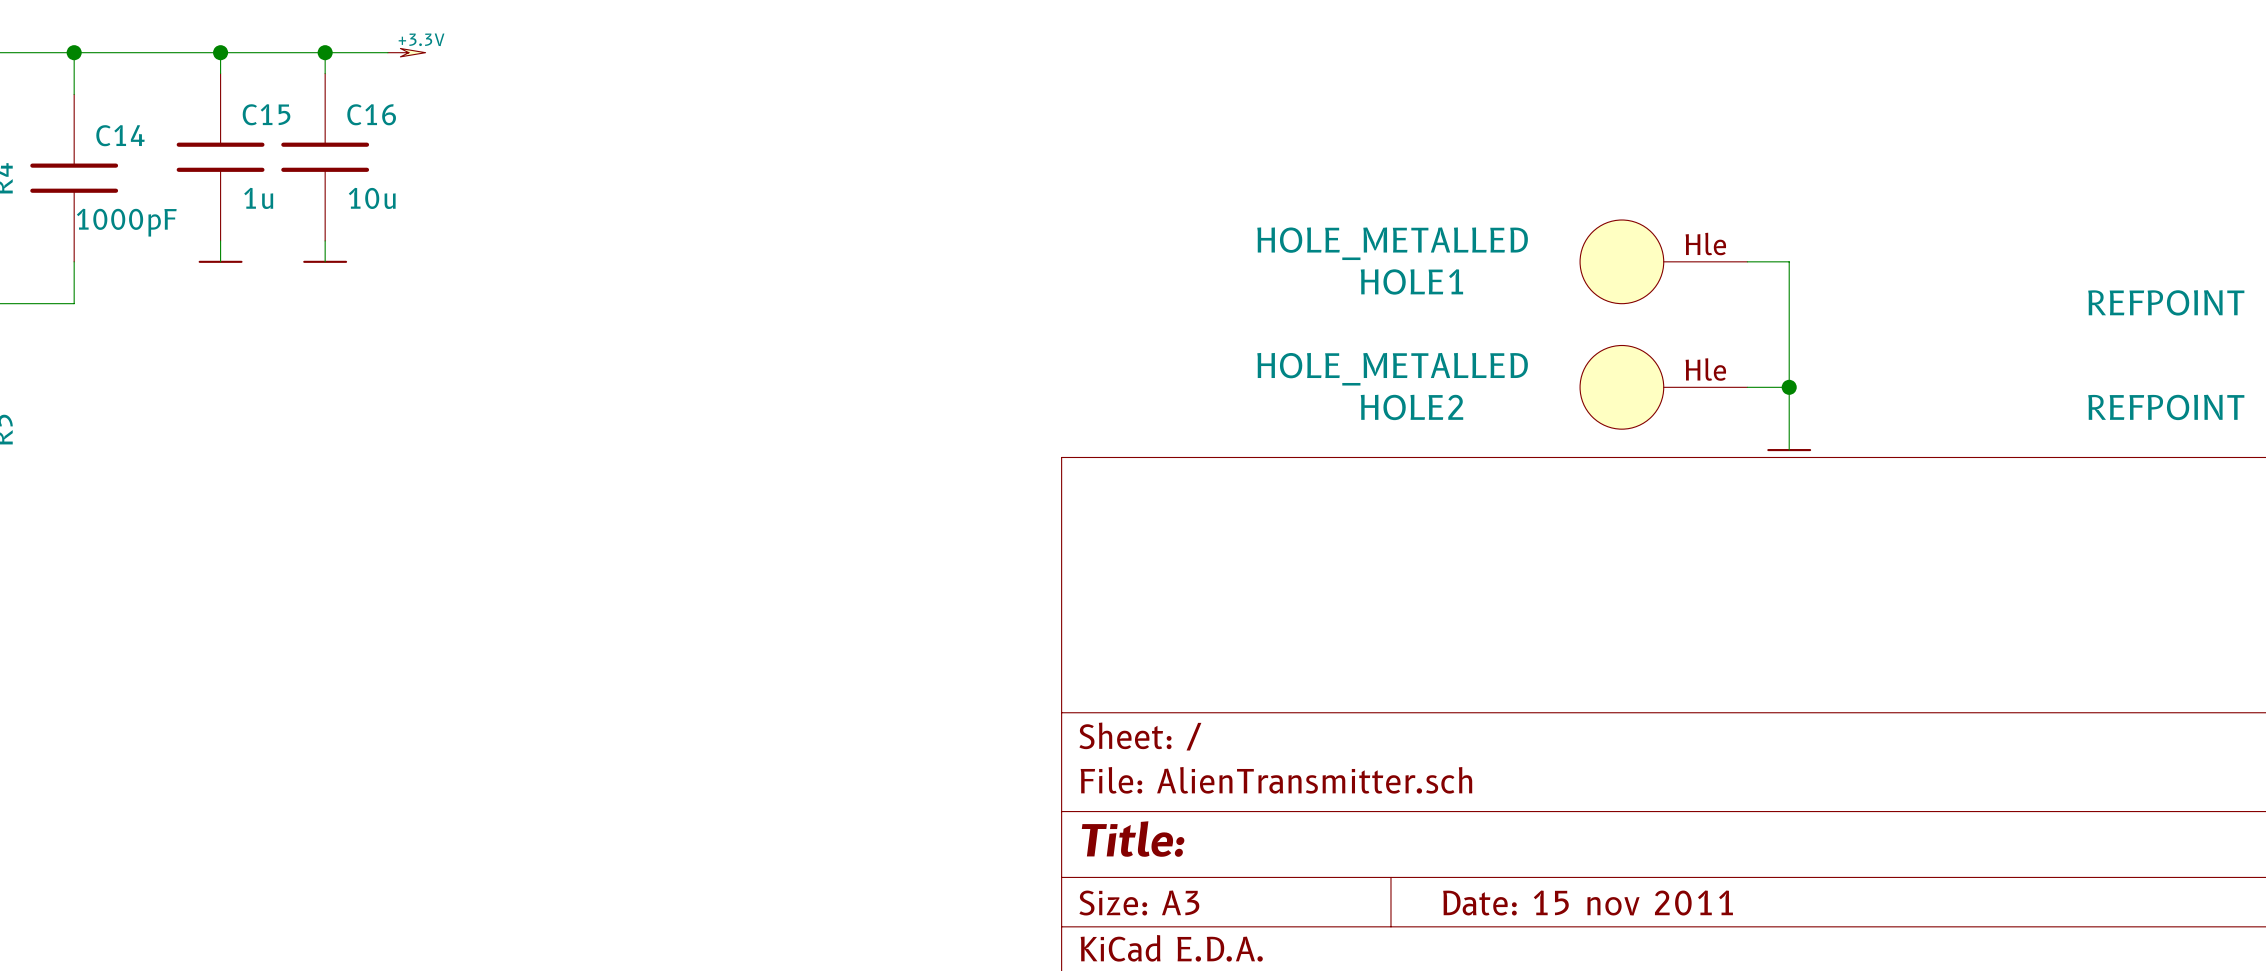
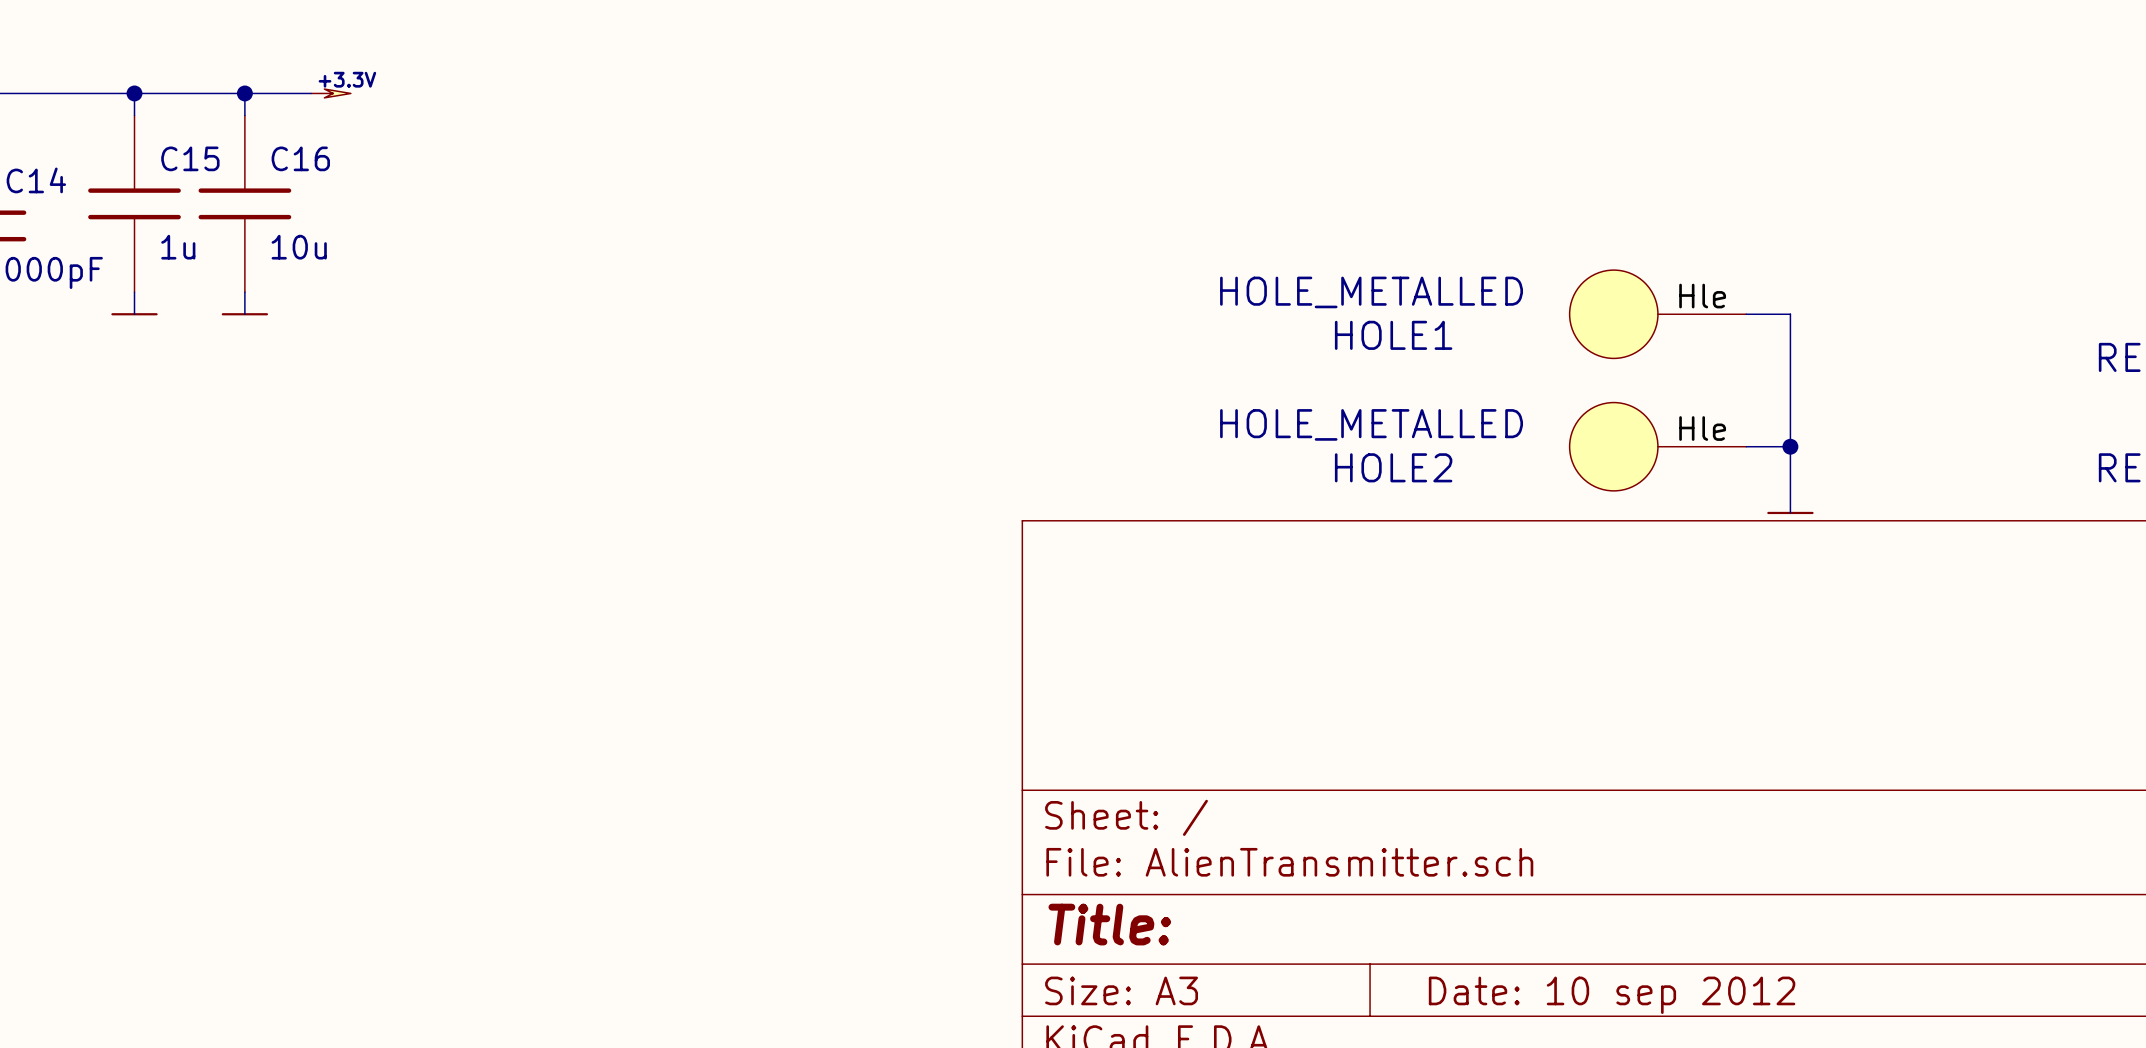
title block: Date: 15 nov 2011 (1588, 903) -> Date: 10 sep 2012 (1612, 995)

